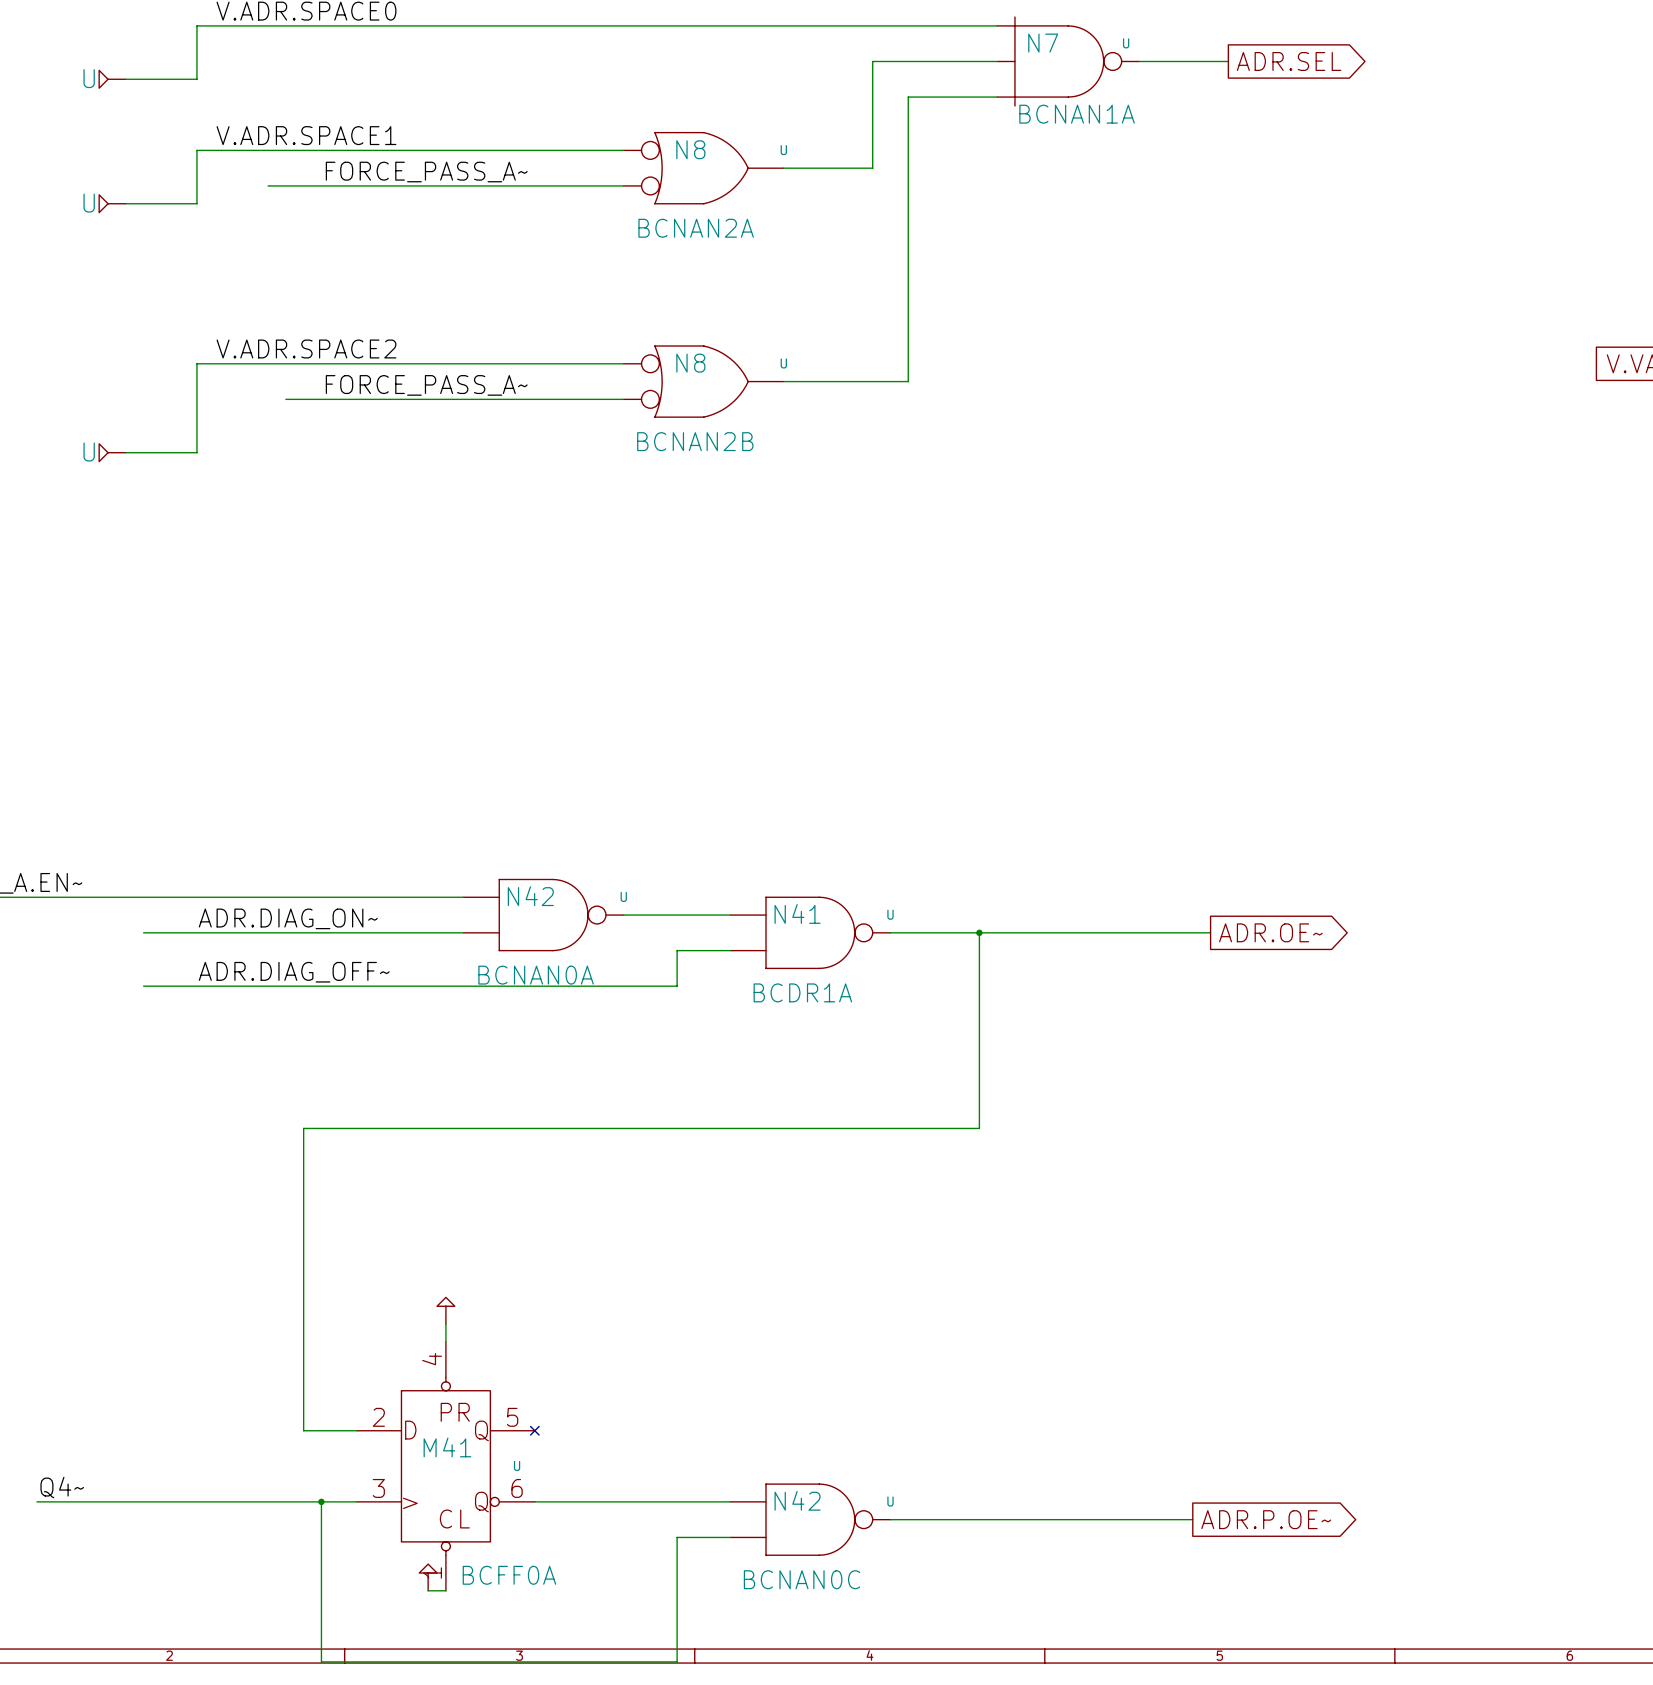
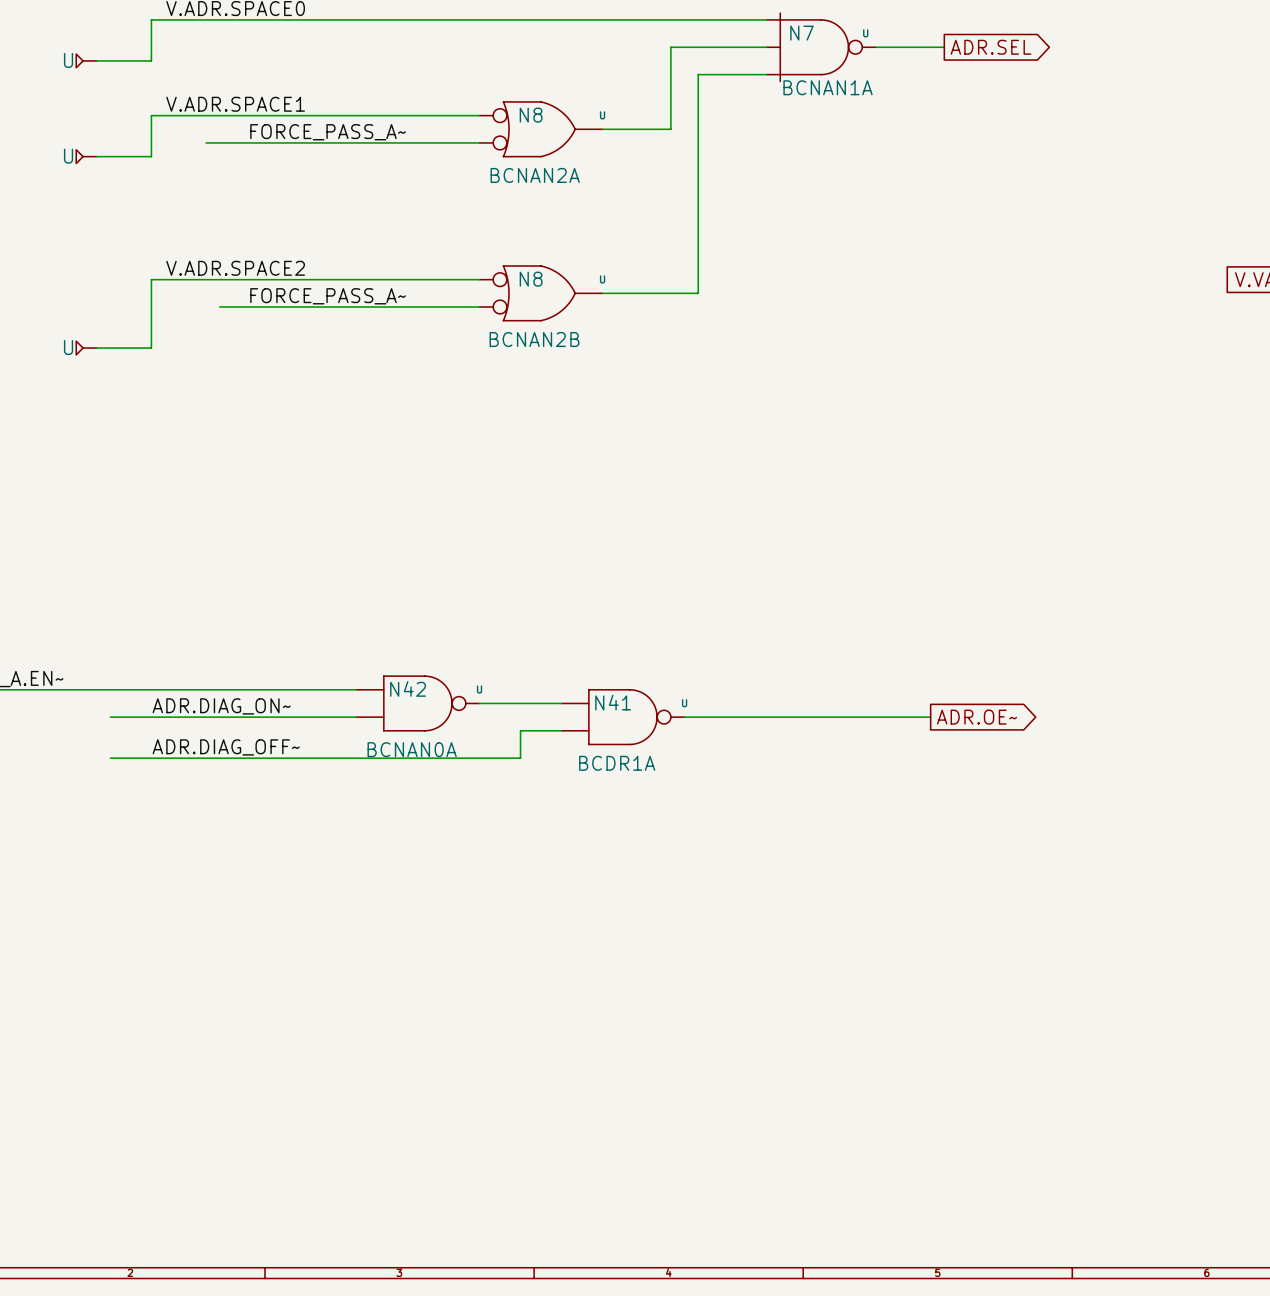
wire: (979, 932) (979, 1128) (303, 1128) (303, 1430) (357, 1430) -> none
junction: (979, 932) -> none
power symbol: (445, 1310) -> none
wire: (445, 1324) (445, 1341) -> none
no-connect mark: (534, 1430) -> none
U: (445, 1466) -> none
label: Q4~ (62, 1487) -> none
wire: (36, 1501) (357, 1501) -> none
wire: (321, 1501) (321, 1661) (677, 1661) (677, 1537) (730, 1537) -> none
junction: (321, 1501) -> none
wire: (534, 1501) (730, 1501) -> none
U: (810, 1519) -> none
wire: (890, 1519) (1192, 1519) -> none
global label: ADR.P.OE~ (1266, 1519) -> none
power symbol: (428, 1577) -> none
wire: (428, 1590) (445, 1590) -> none

